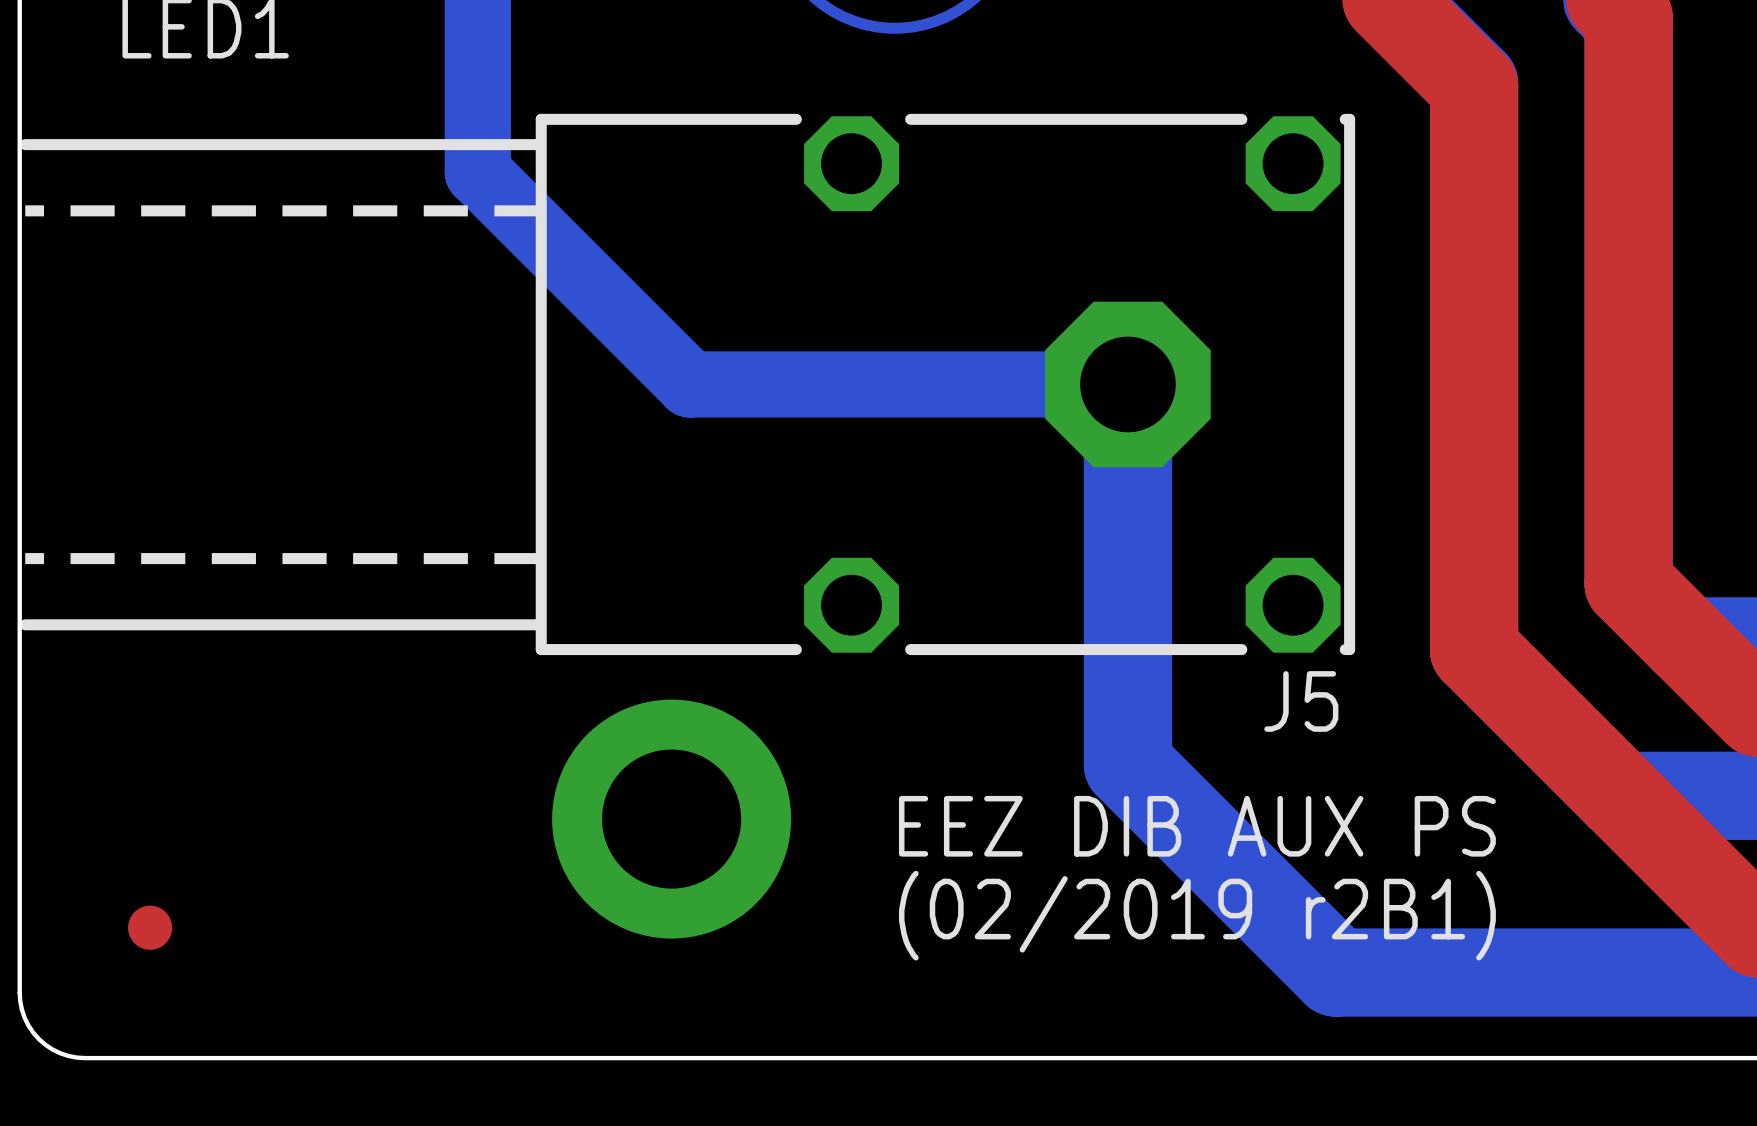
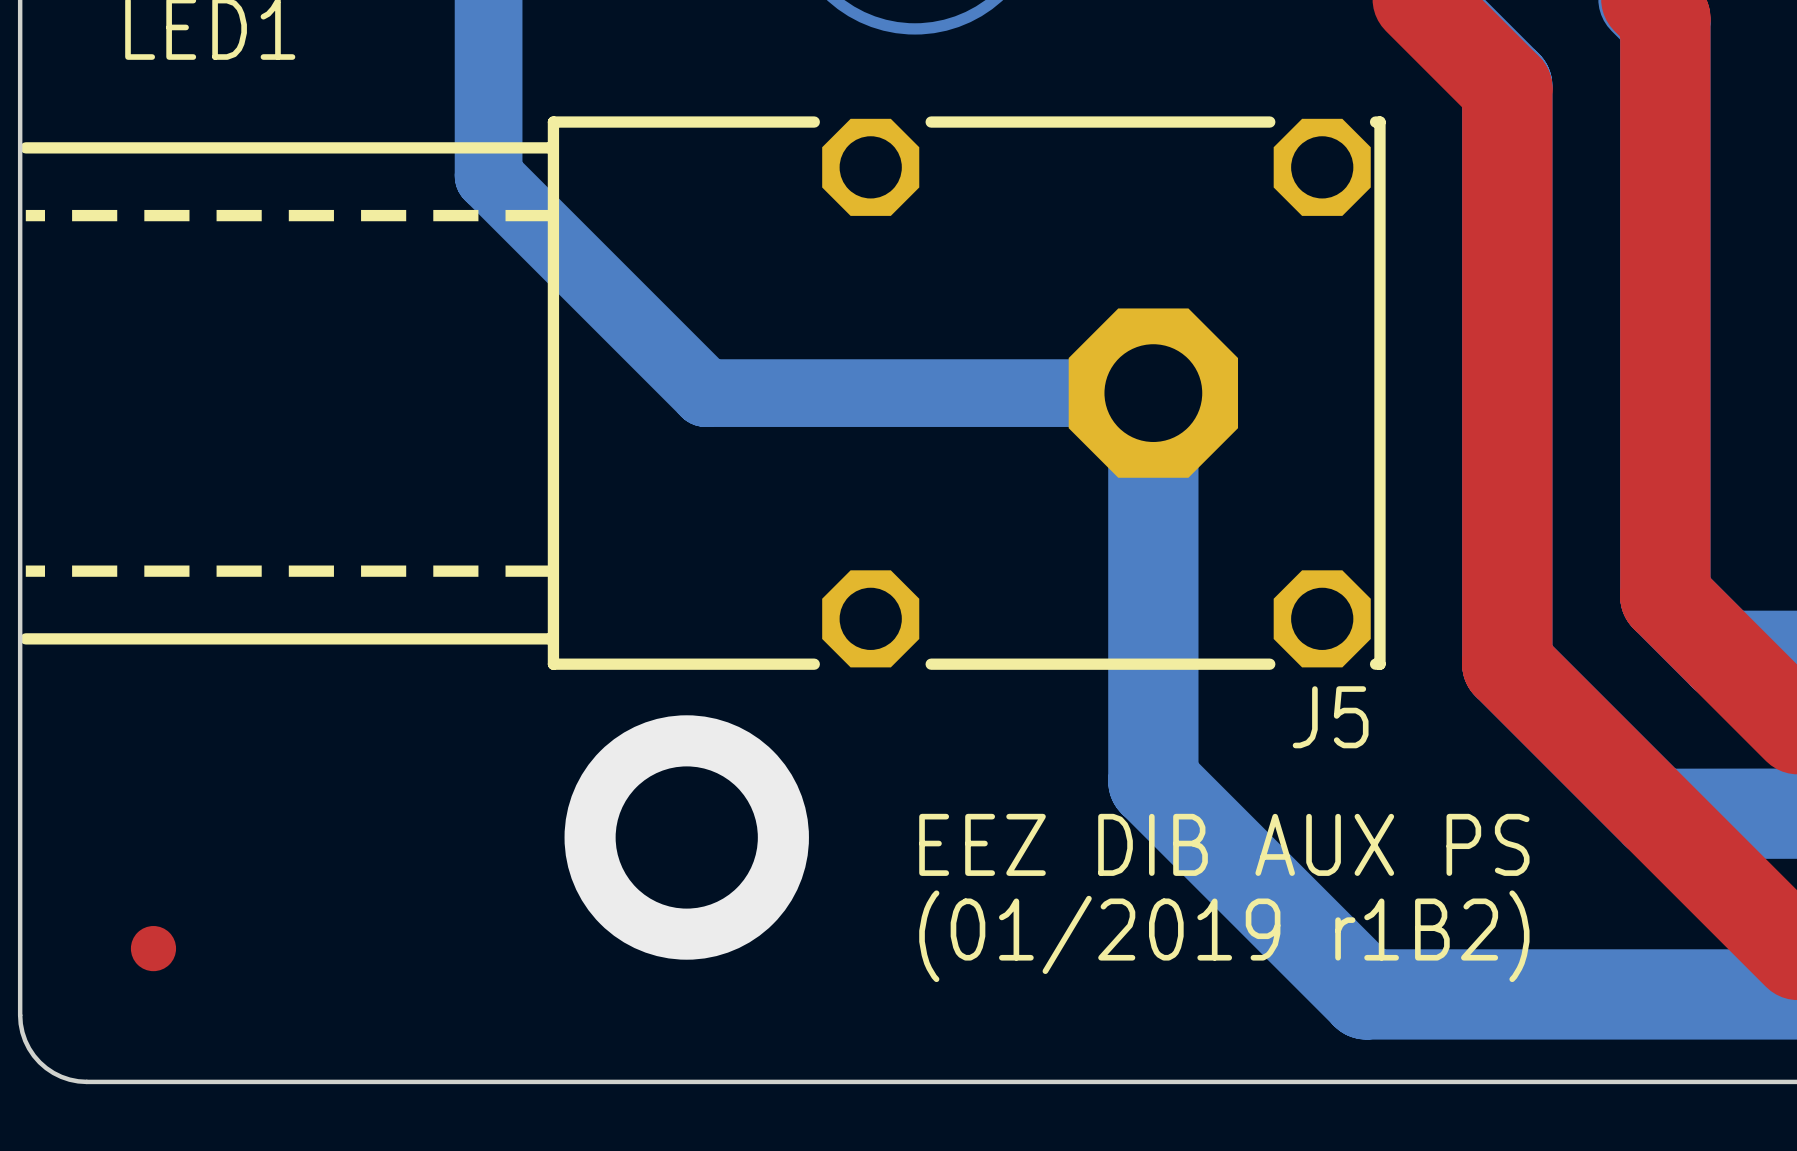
text: (02/2019 r2B1) (1197, 915) -> (01/2019 r1B2) (1224, 936)

